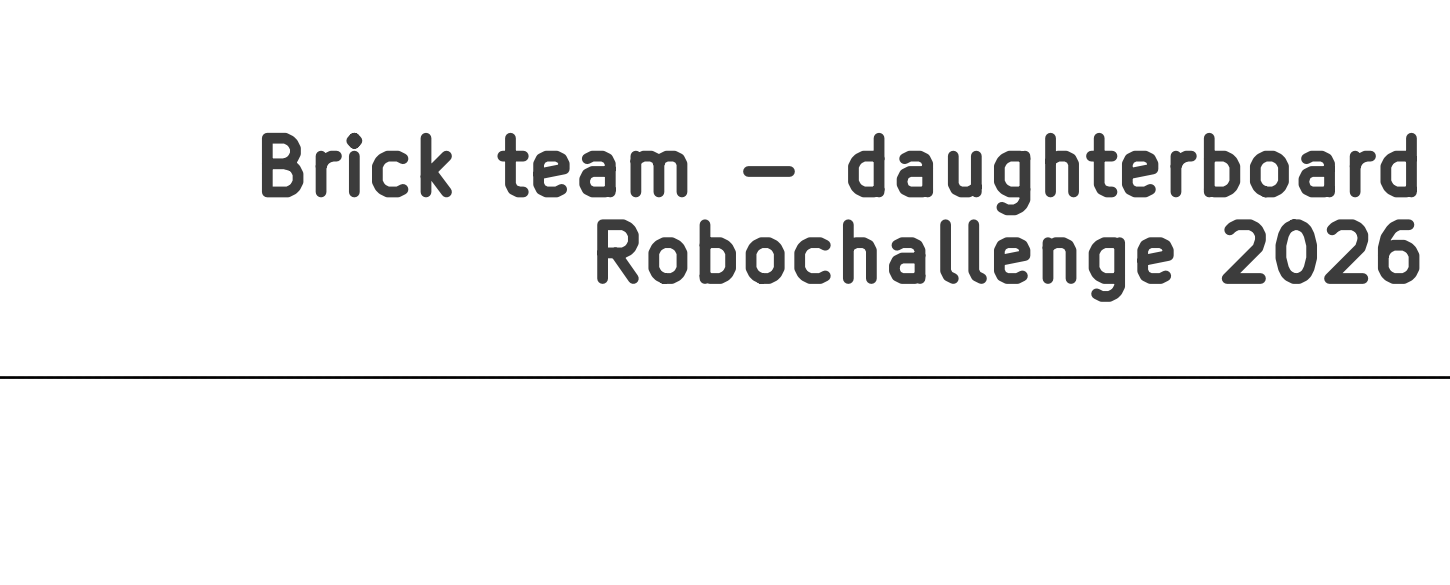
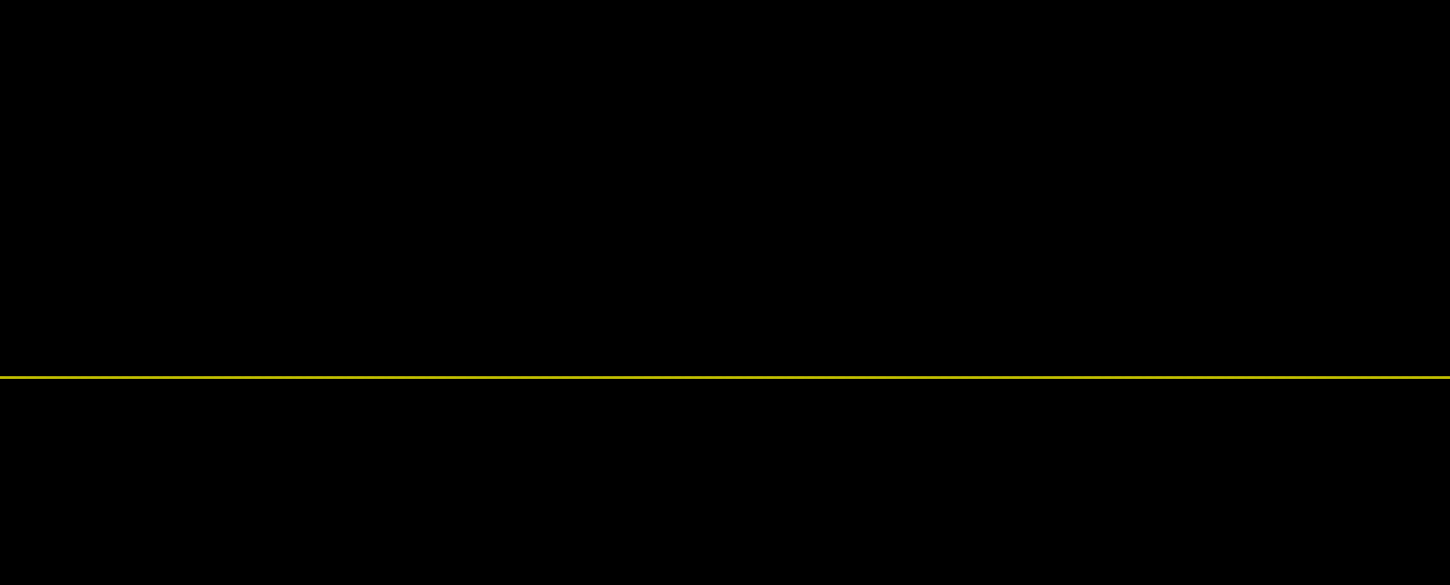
text: Brick team - daughterboard (839, 174) -> none
text: Robochallenge 2026 (1008, 260) -> none

